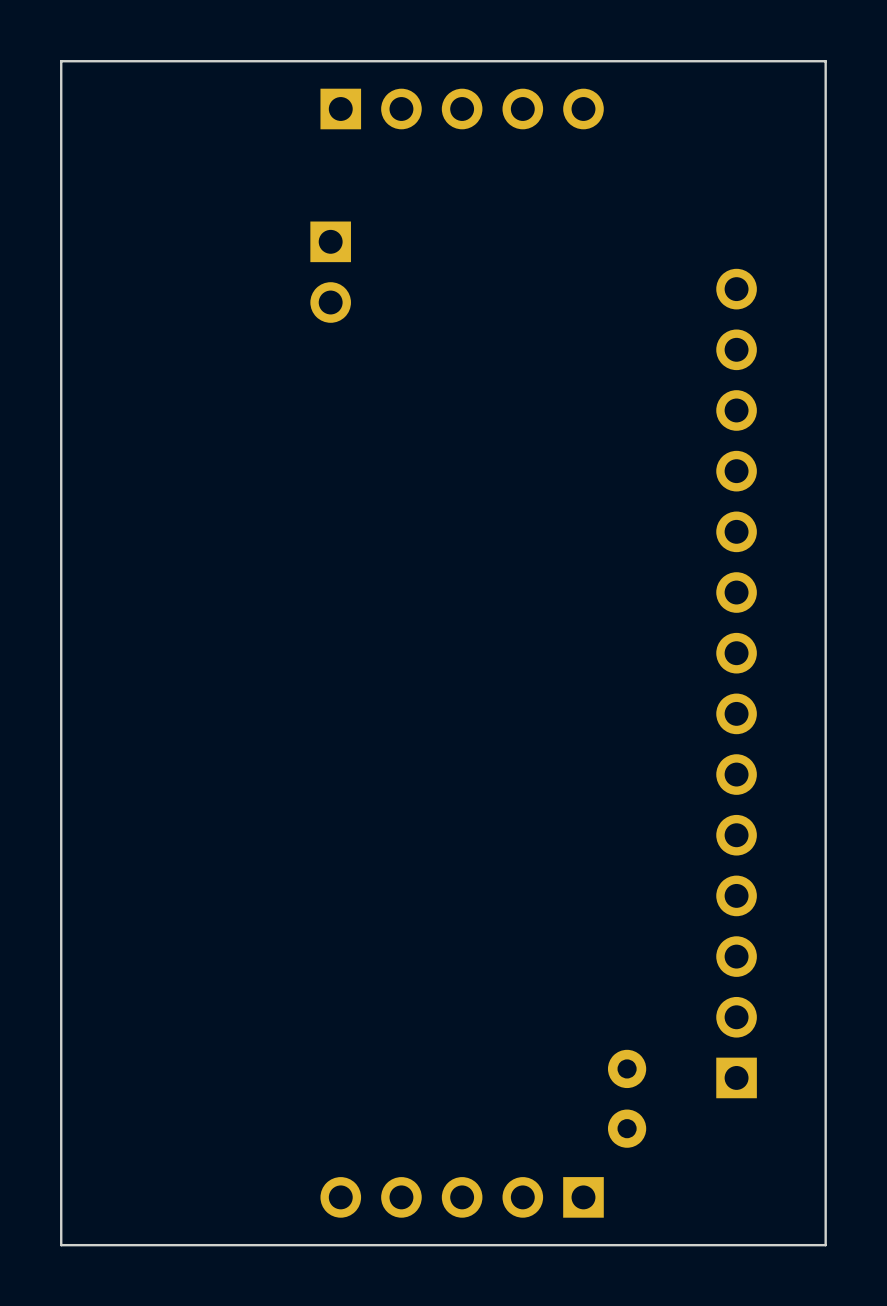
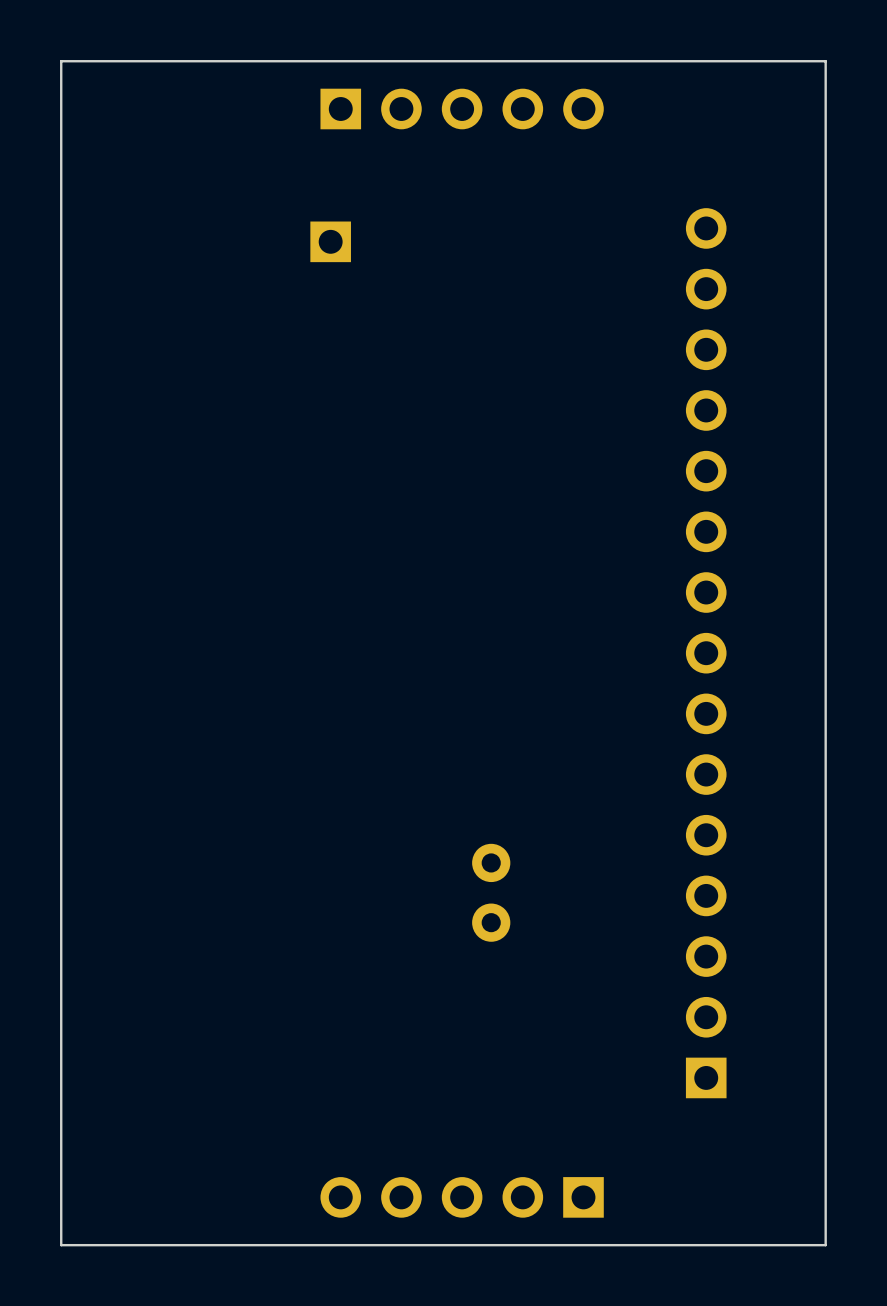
part: (330, 272) -> none
part: none -> (706, 653)
part: (736, 683) -> none
part position: (627, 1098) -> (491, 892)

